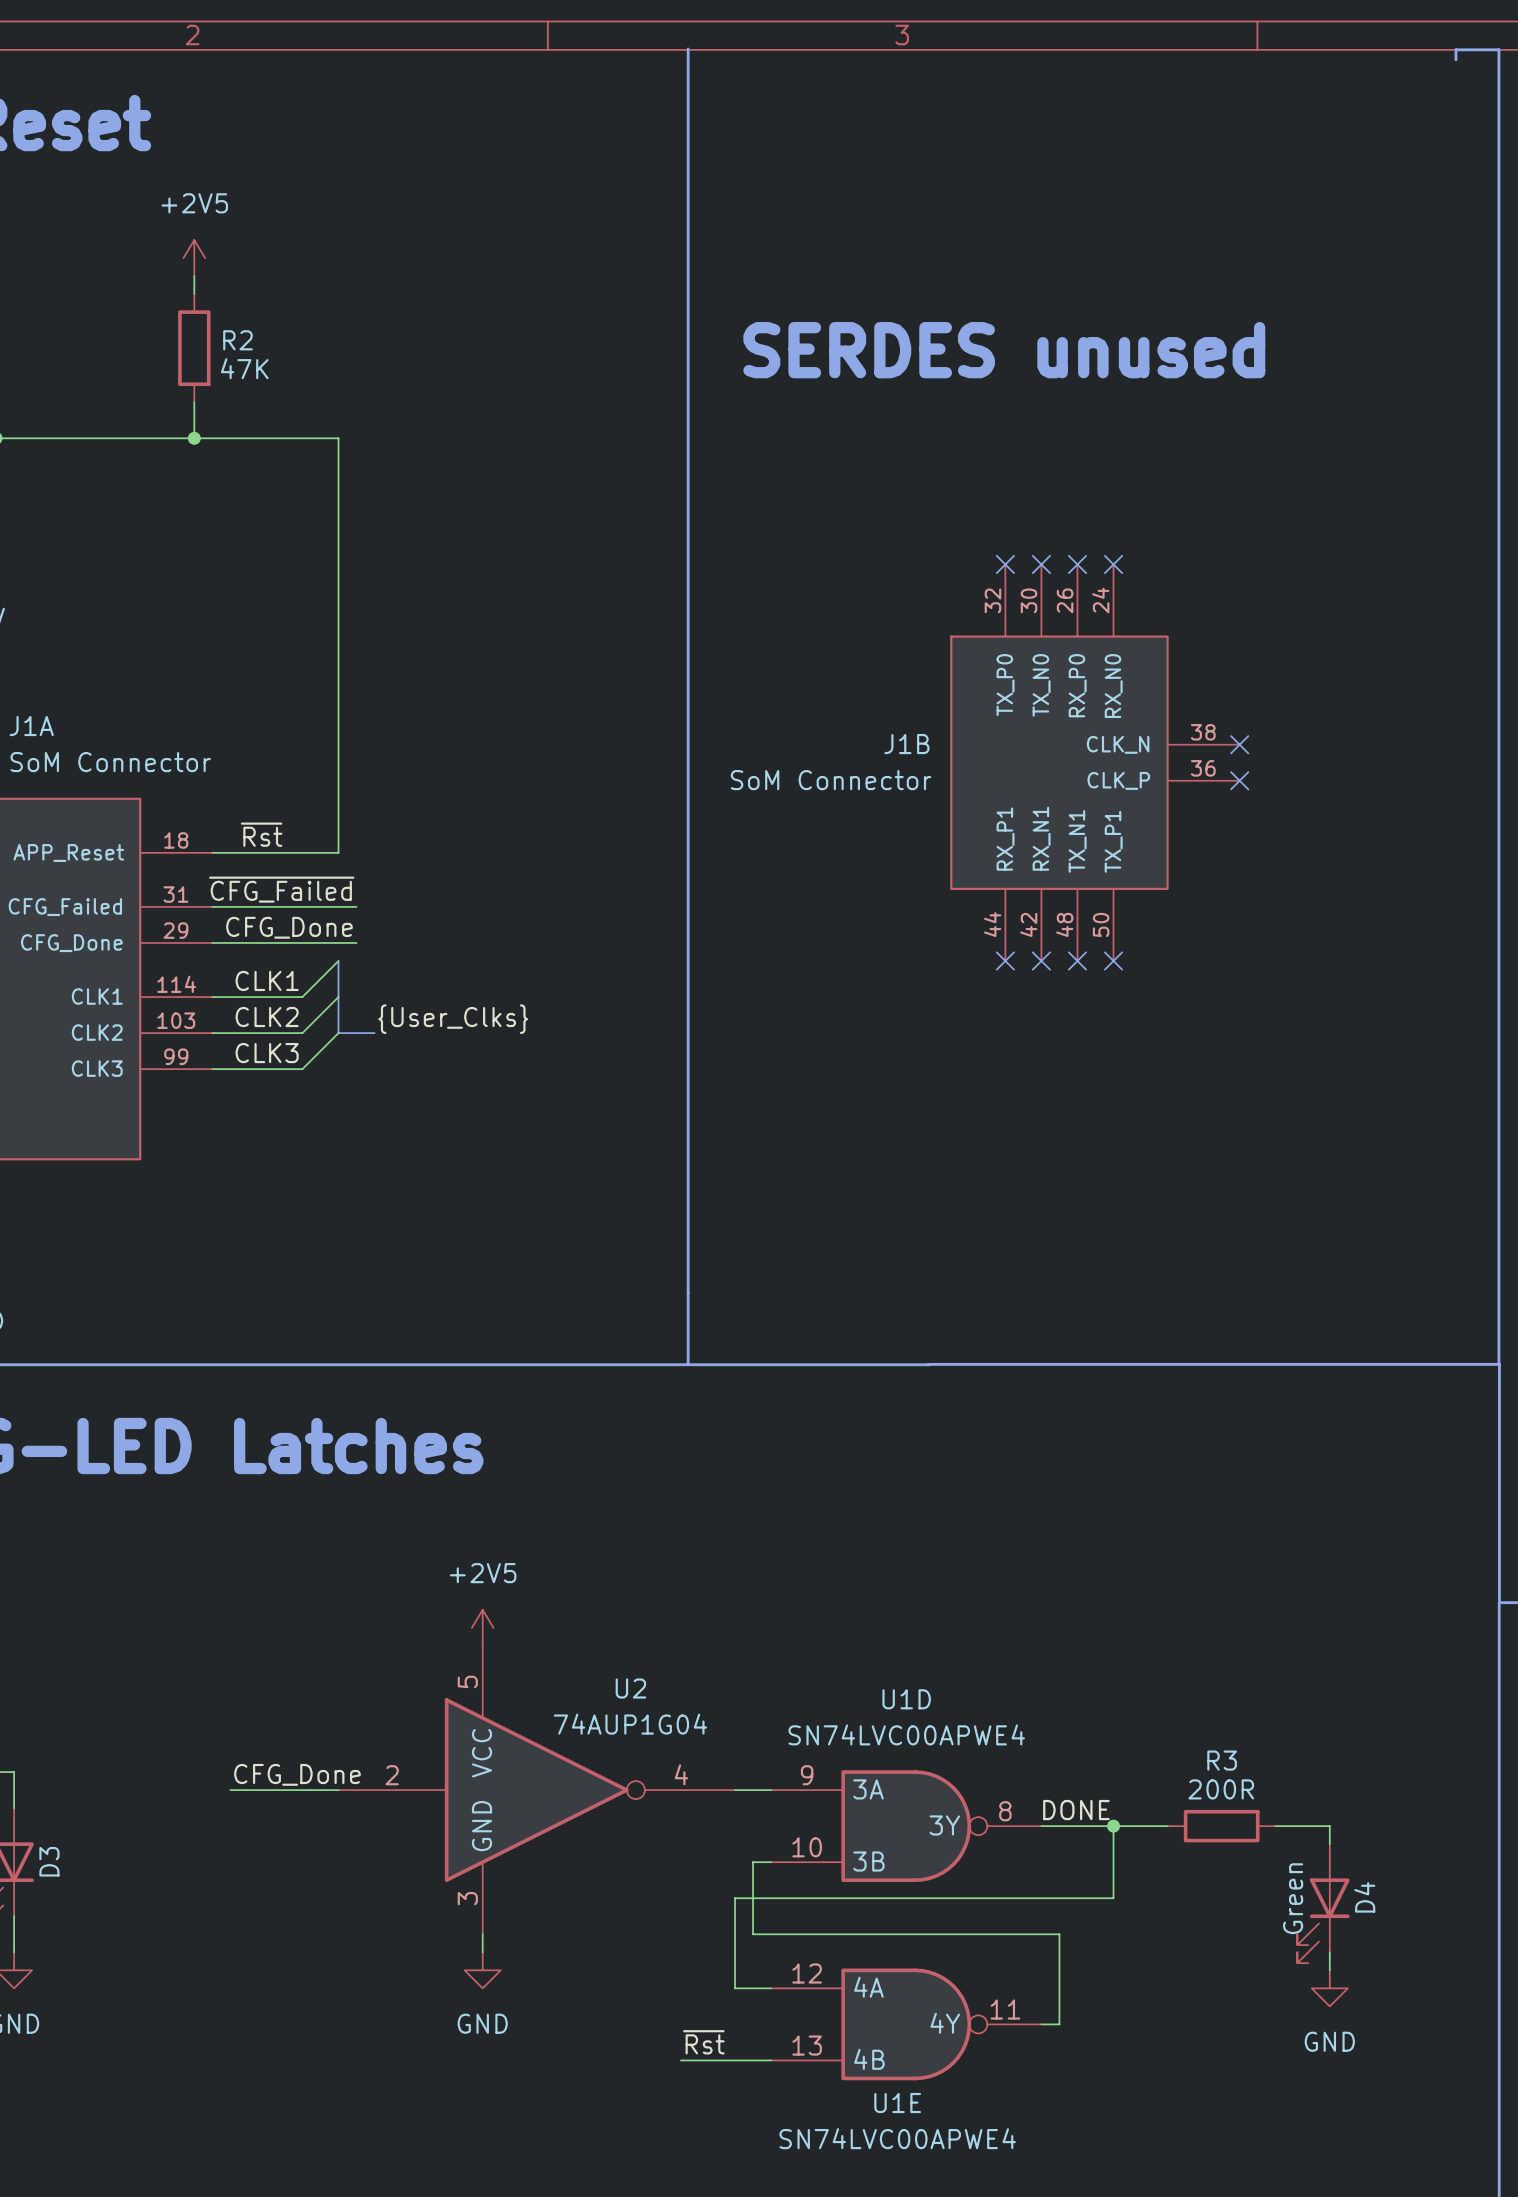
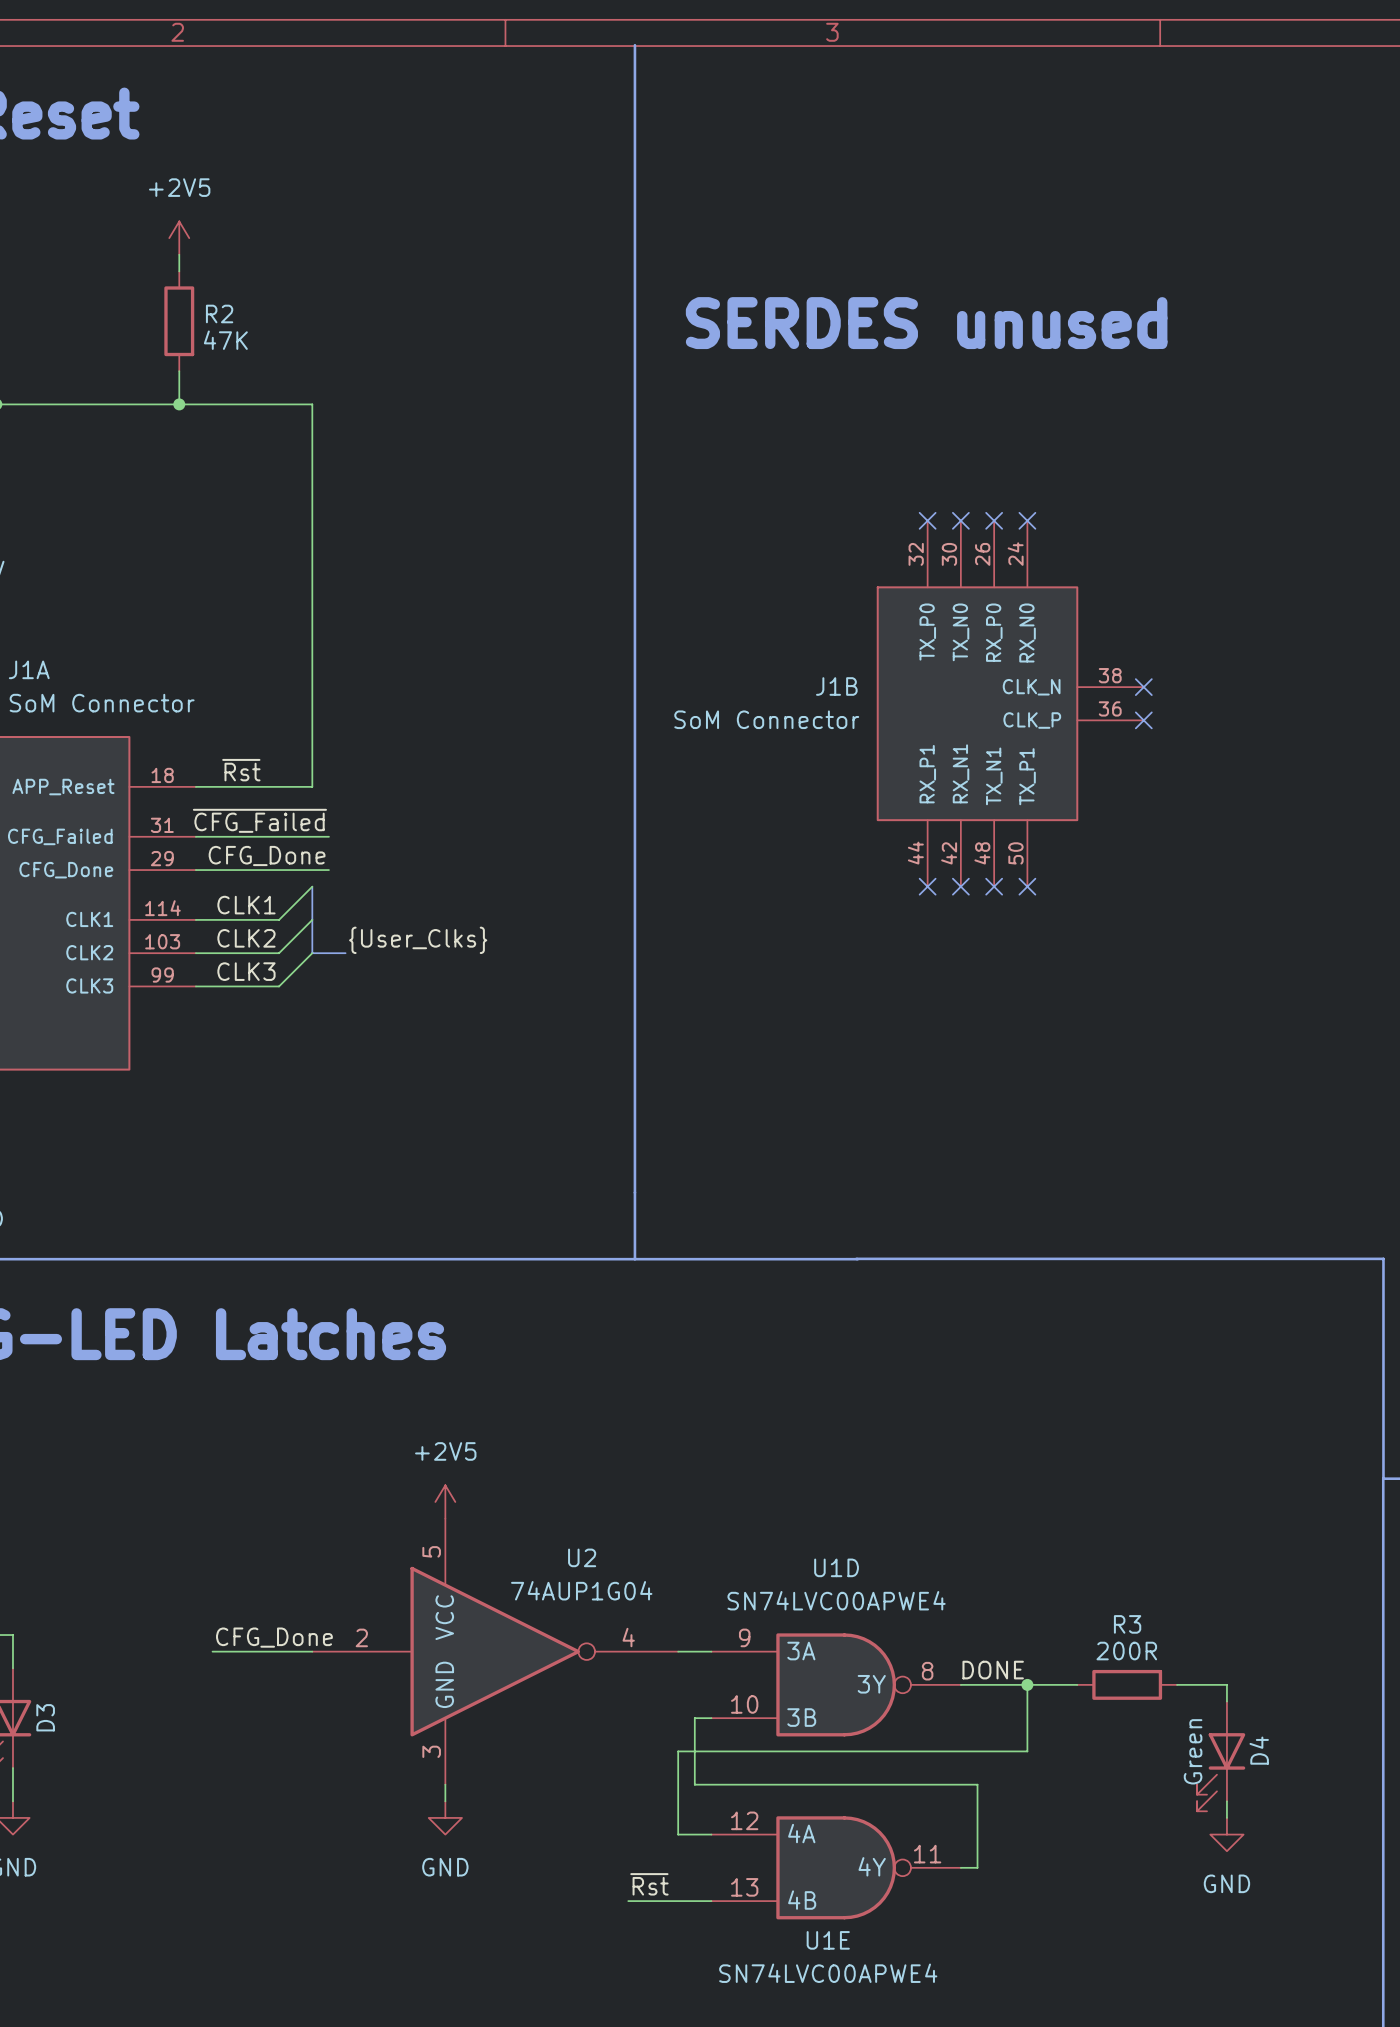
line: (1455, 59) (1455, 49) (1498, 49) (1498, 1364) -> none

